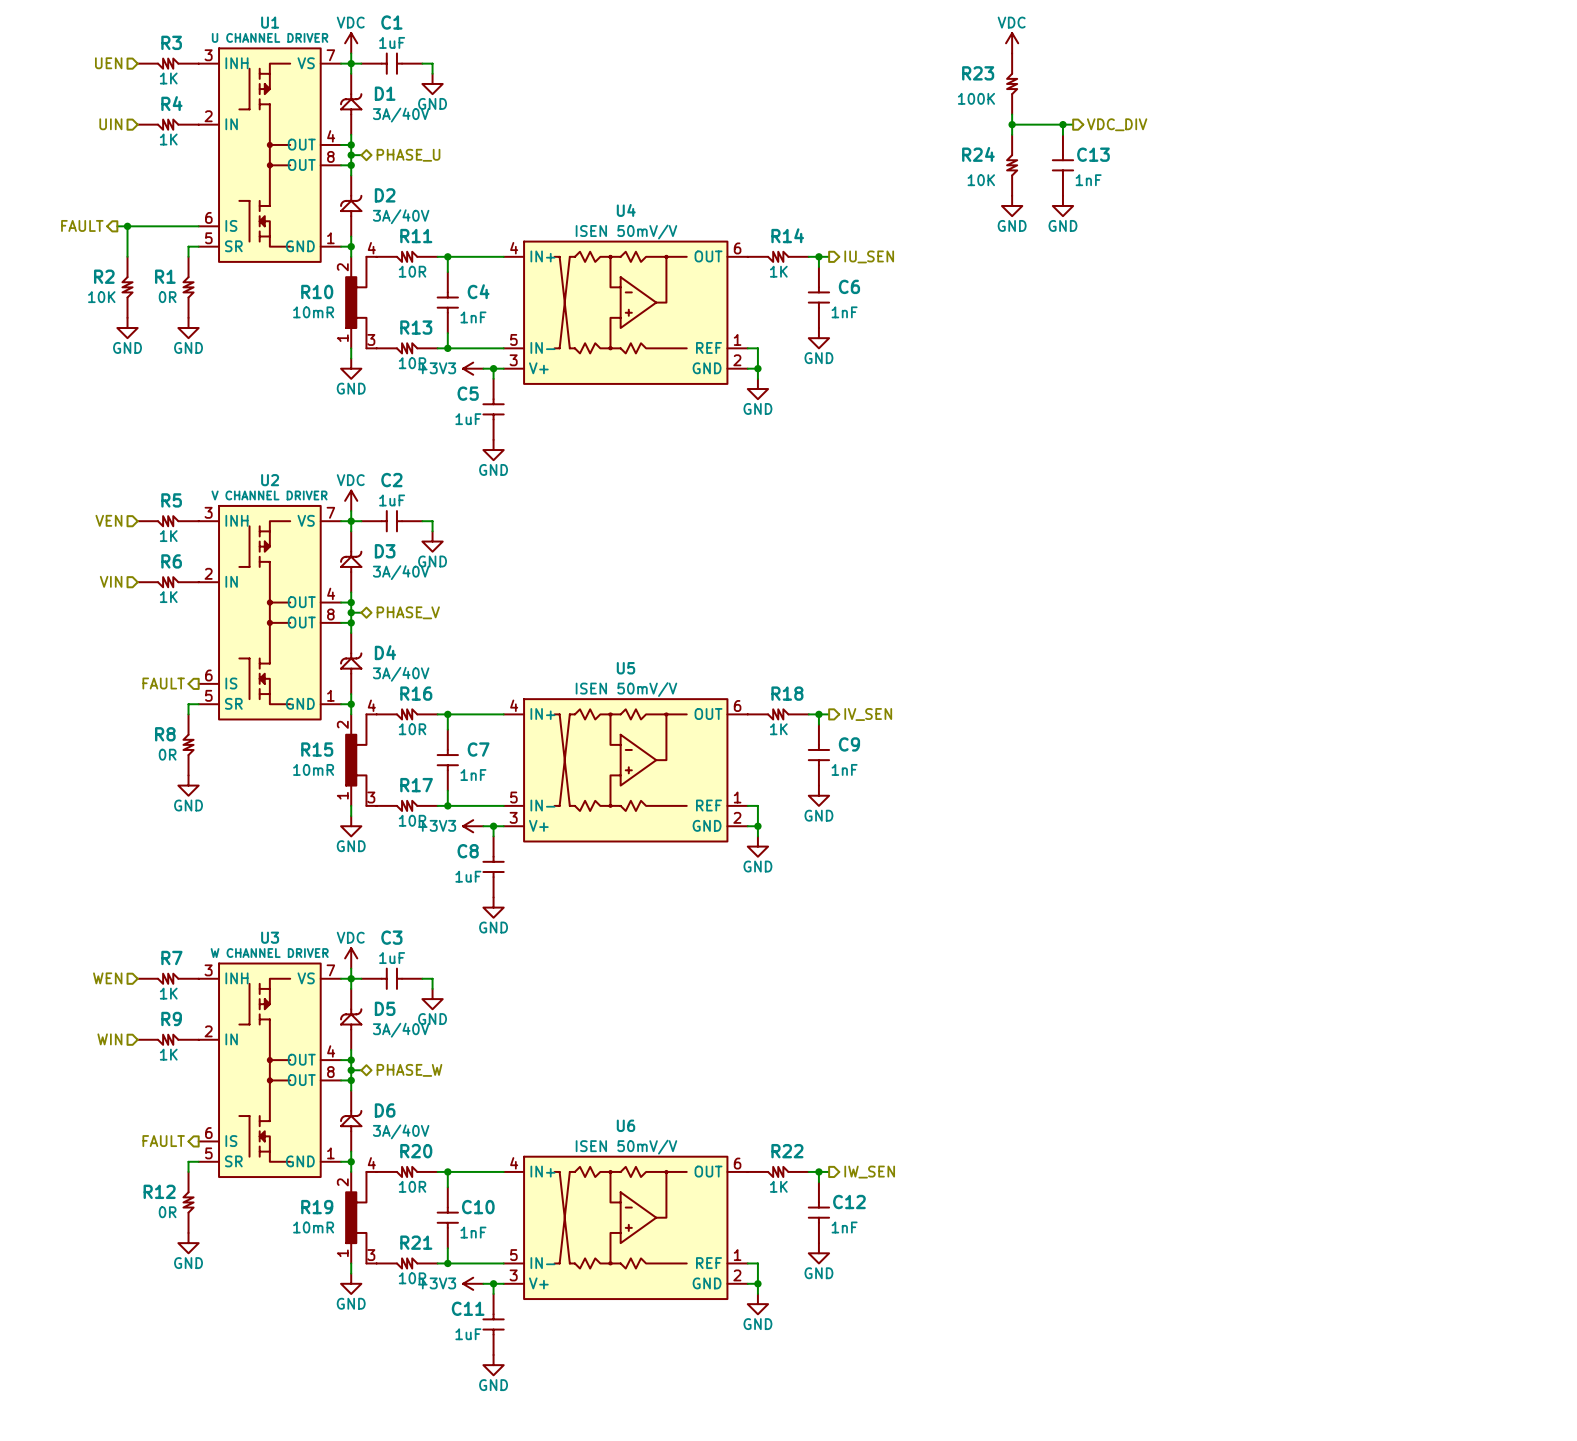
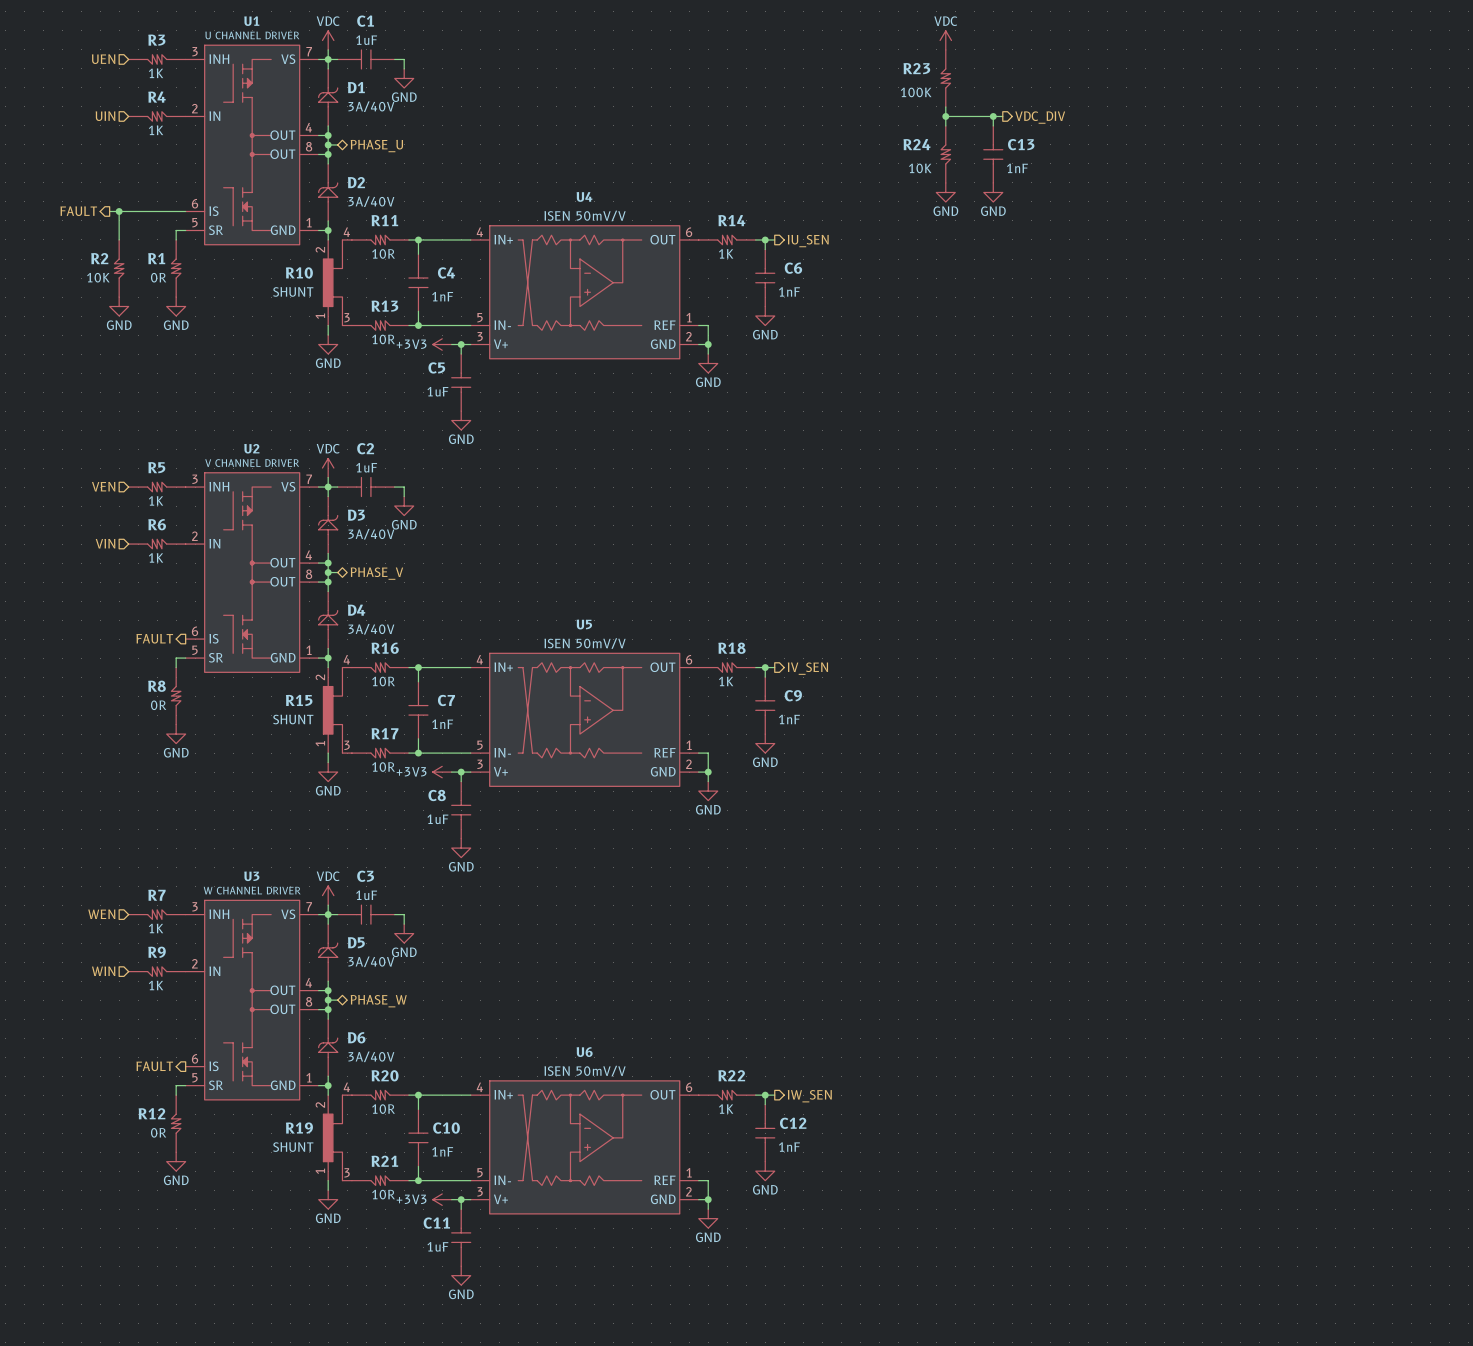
R10 value: 10mR (313, 312) -> SHUNT (293, 291)
R15 value: 10mR (313, 769) -> SHUNT (293, 719)
R19 value: 10mR (313, 1227) -> SHUNT (293, 1147)

